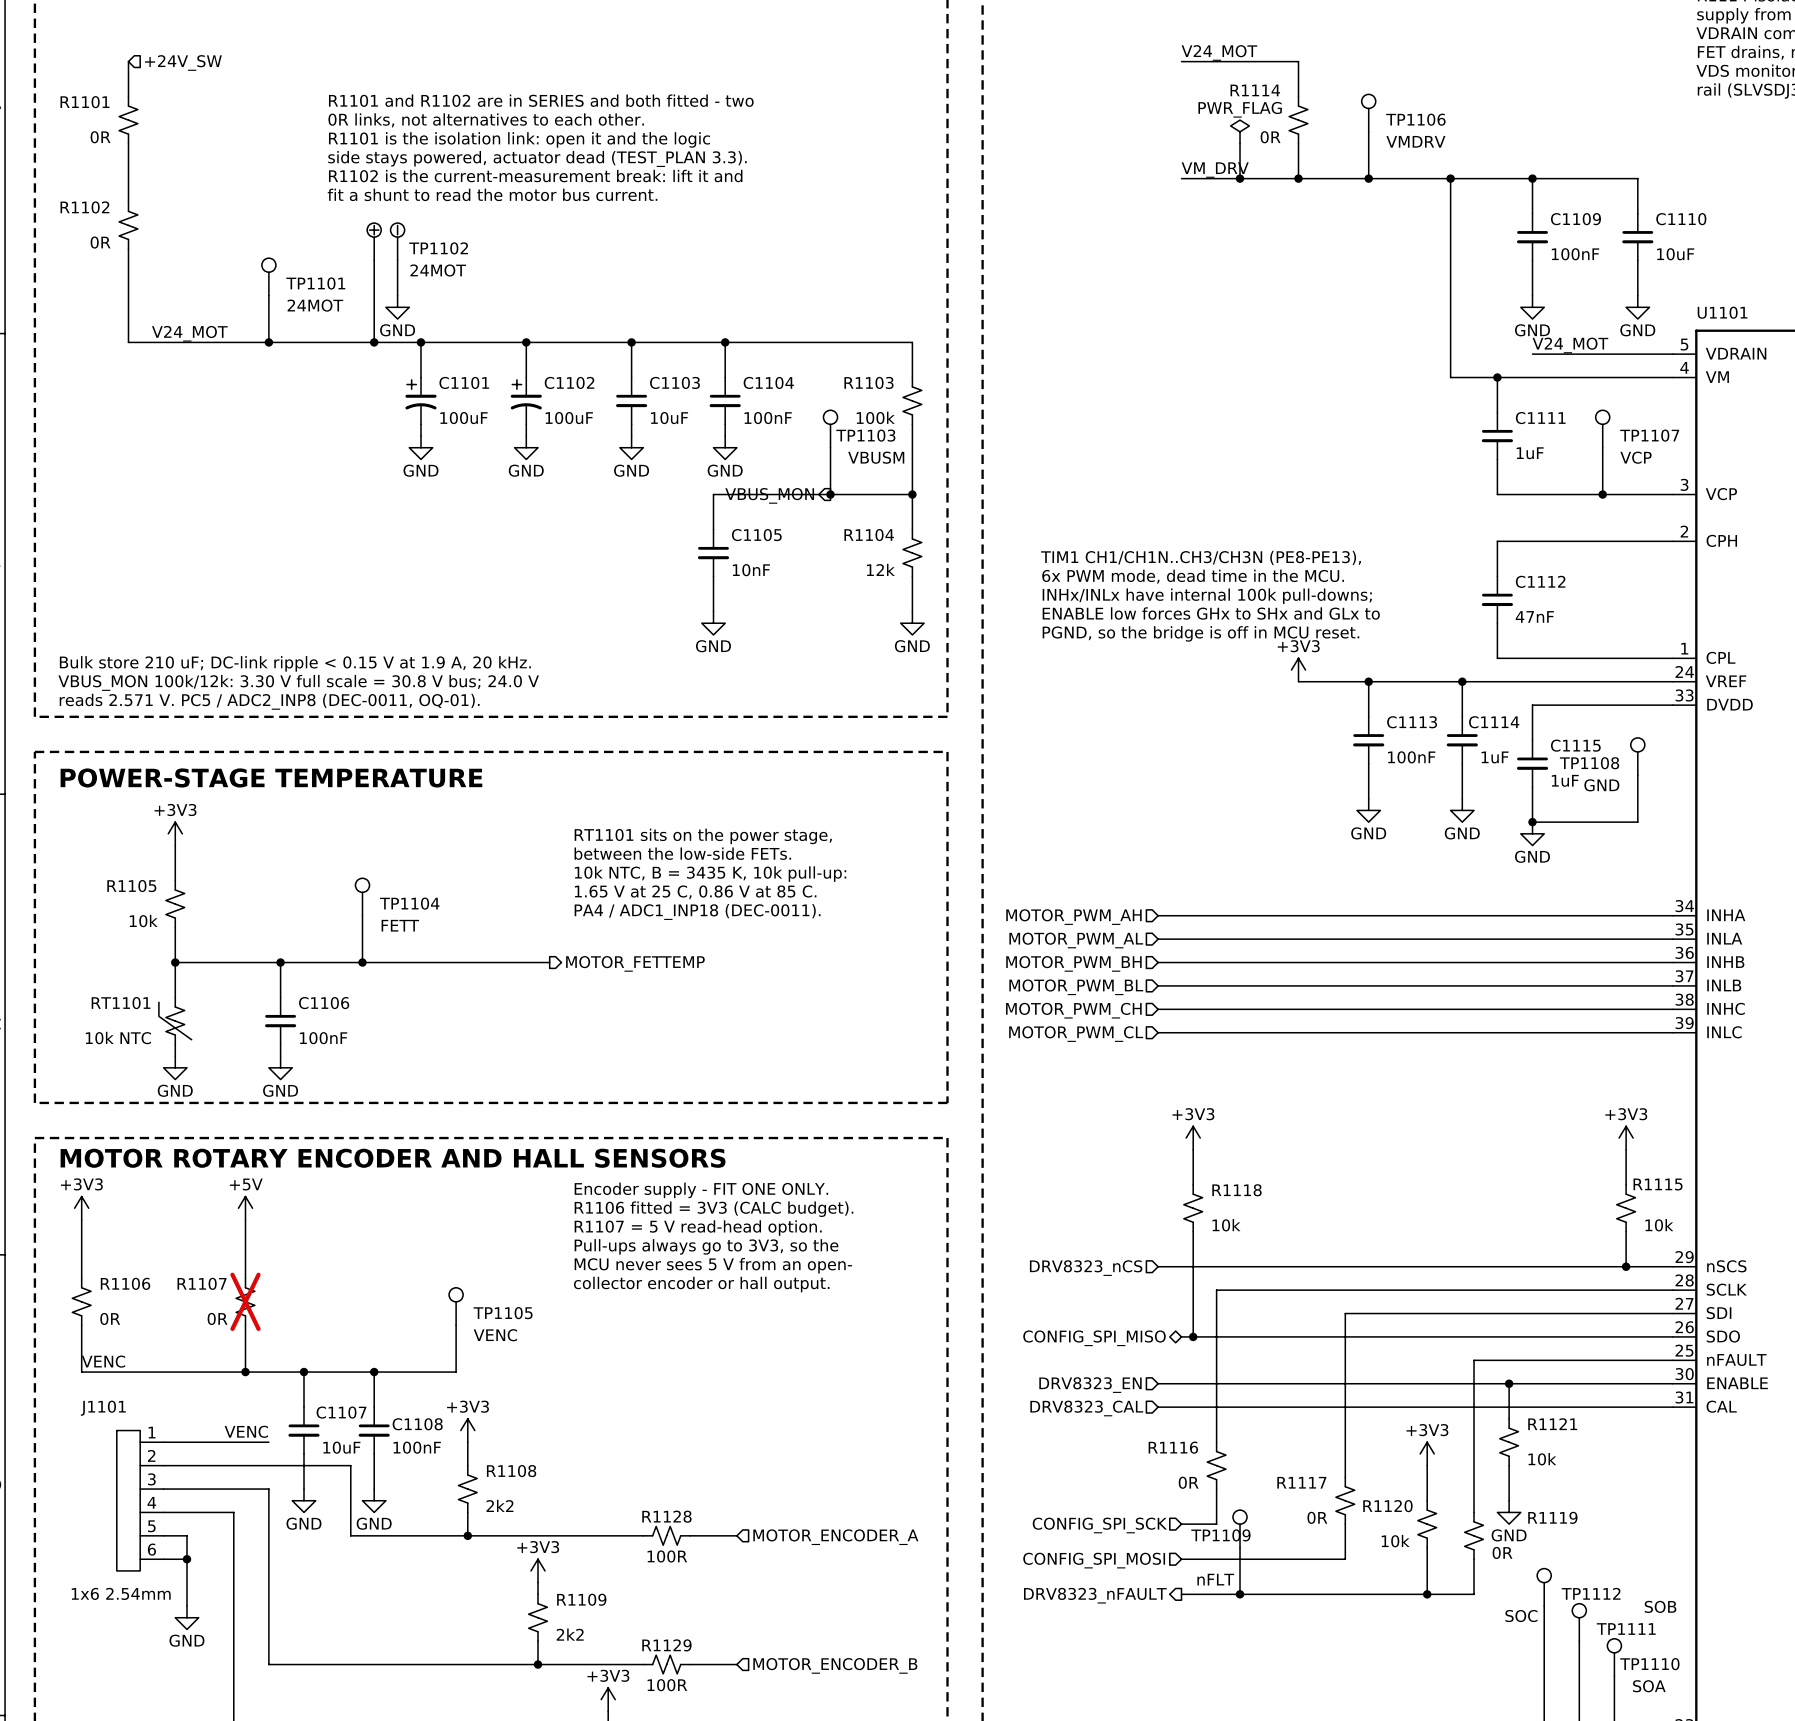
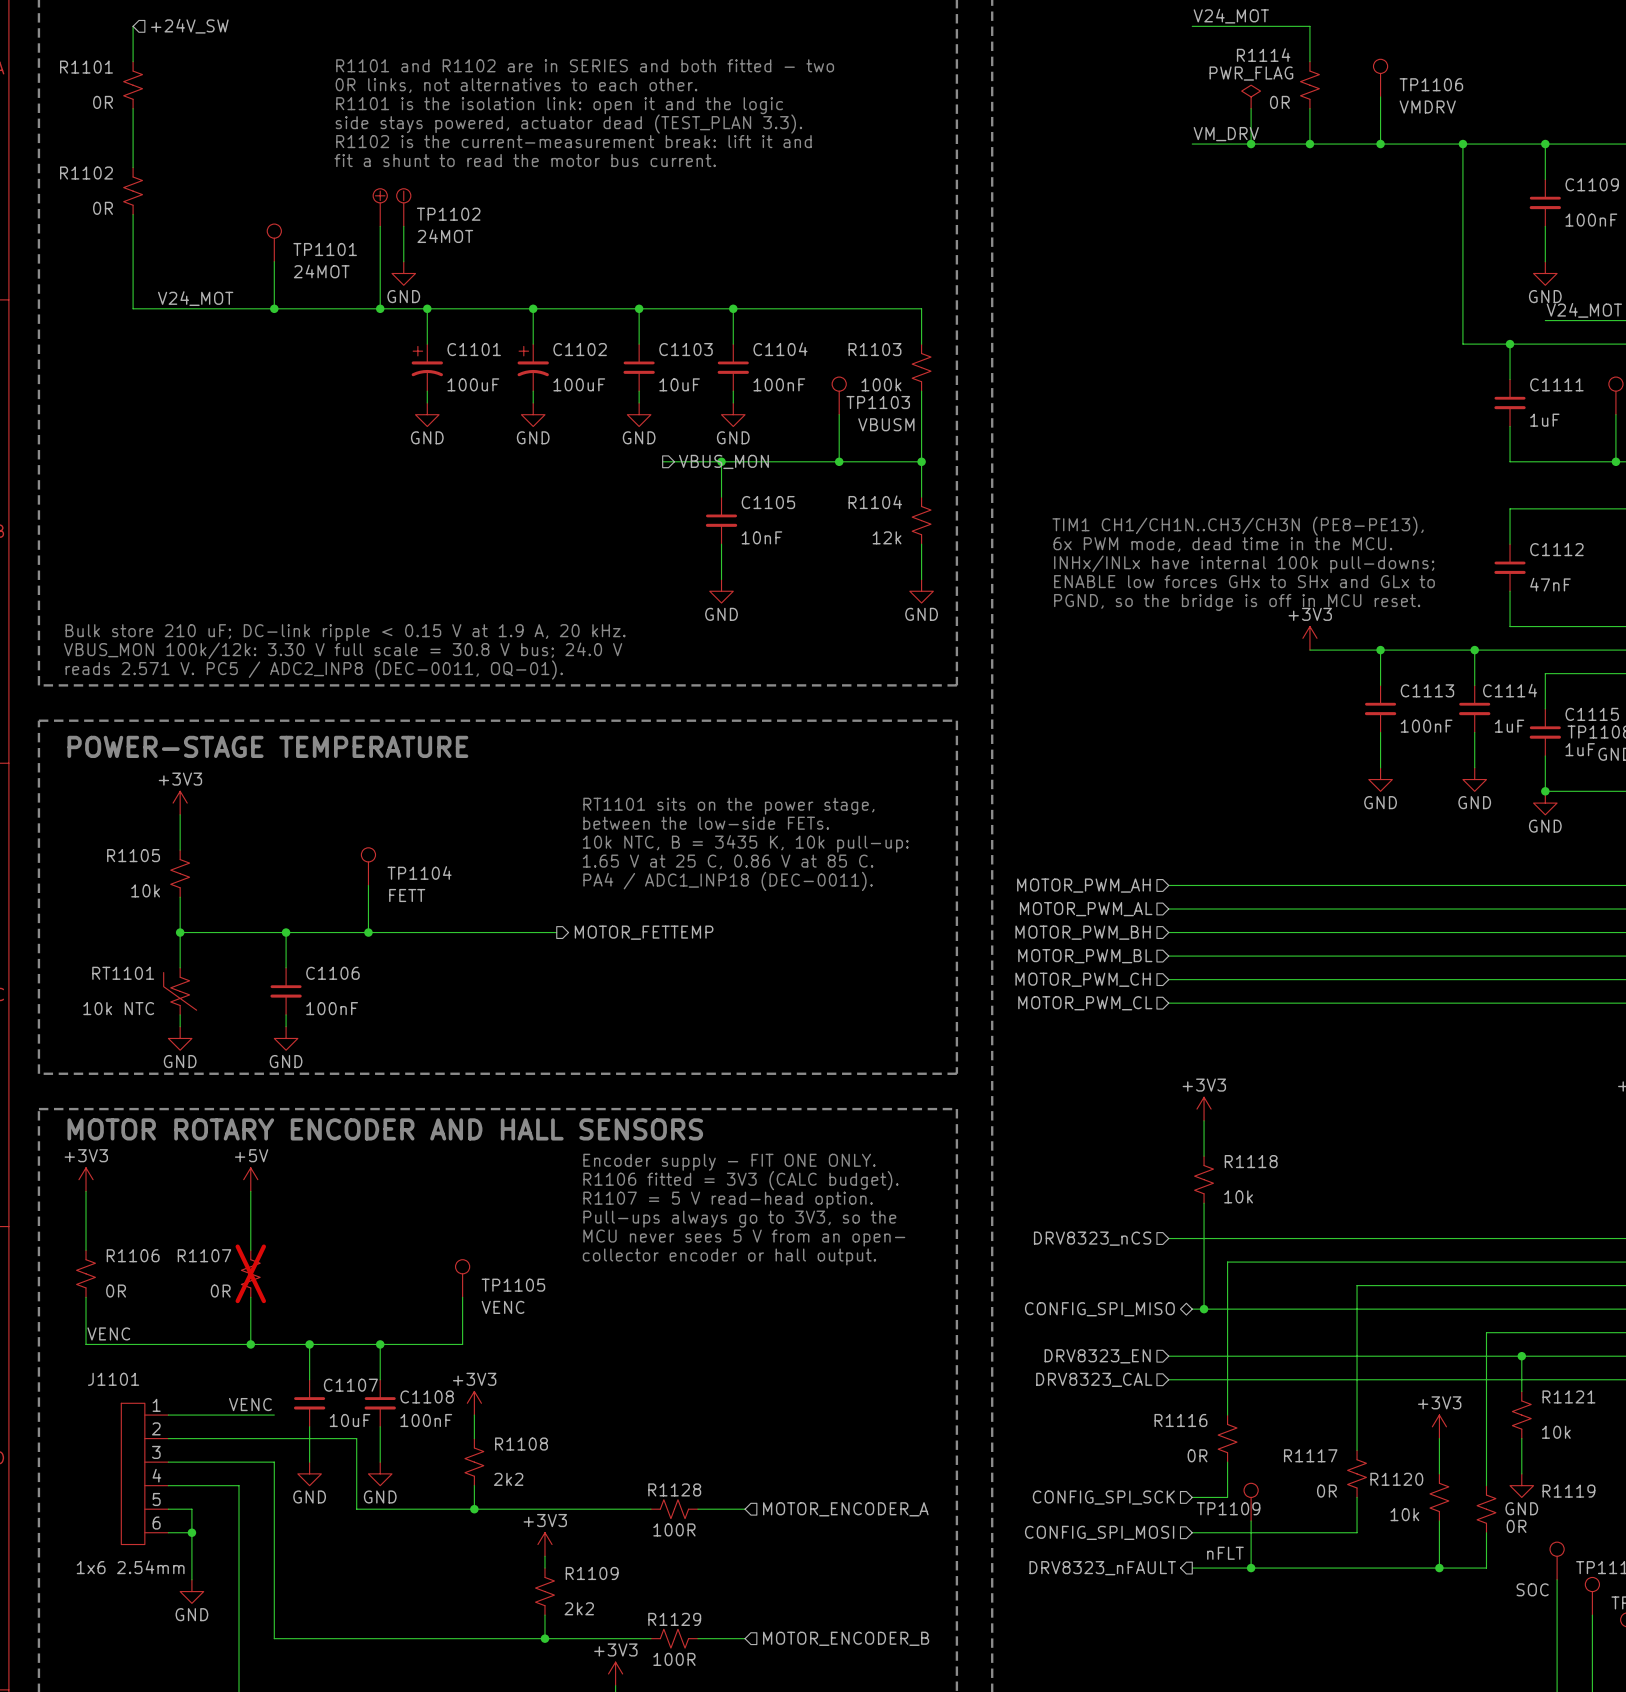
wire: none -> (662, 461) (721, 461)
junction: none -> (721, 461)
hierarchical label rotation: 0° (769, 495) -> 180° (723, 461)

